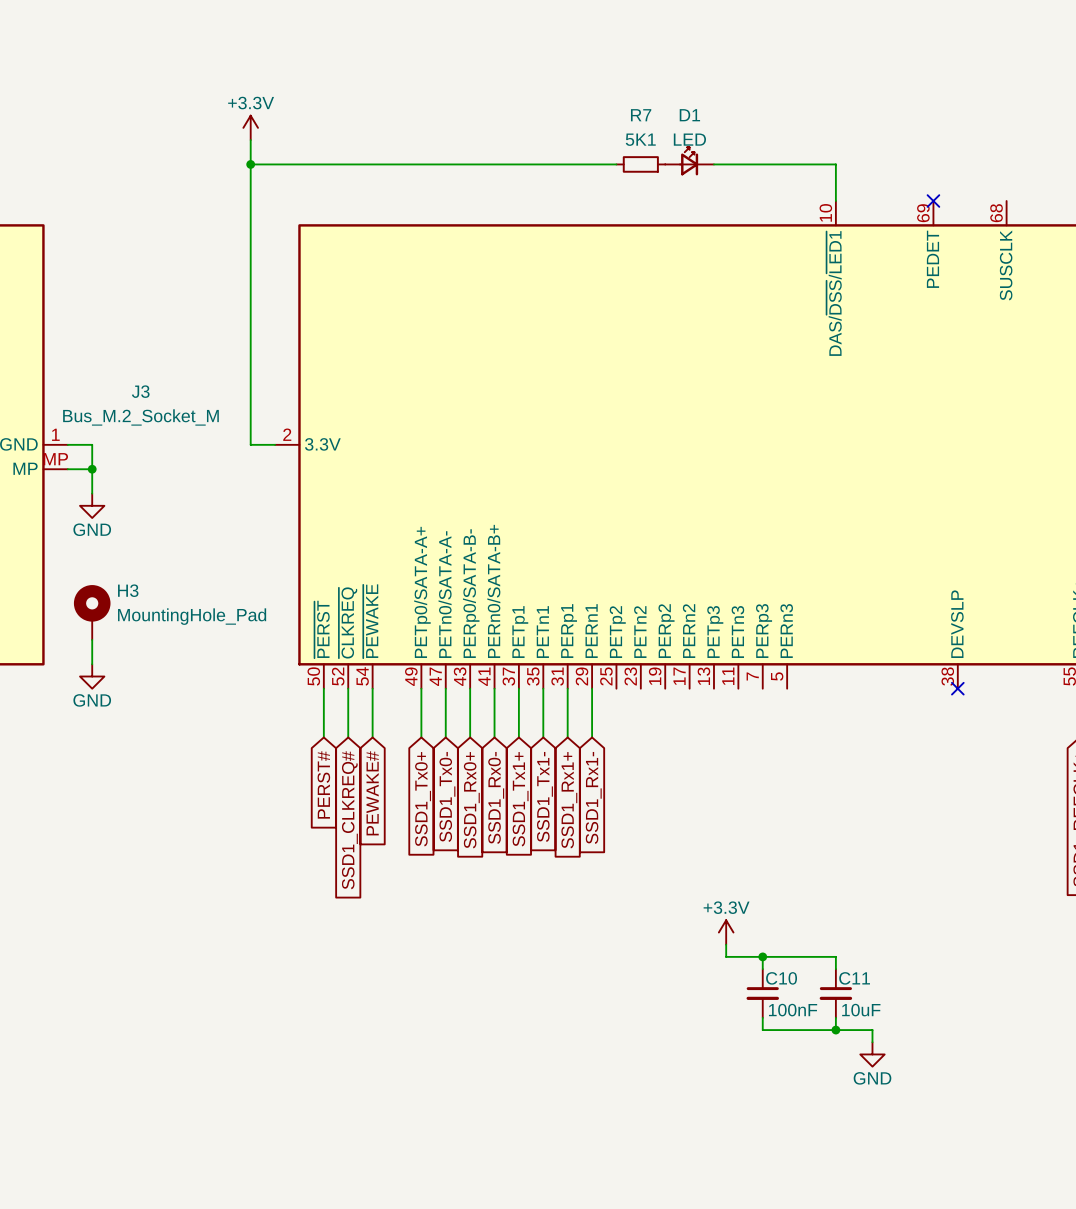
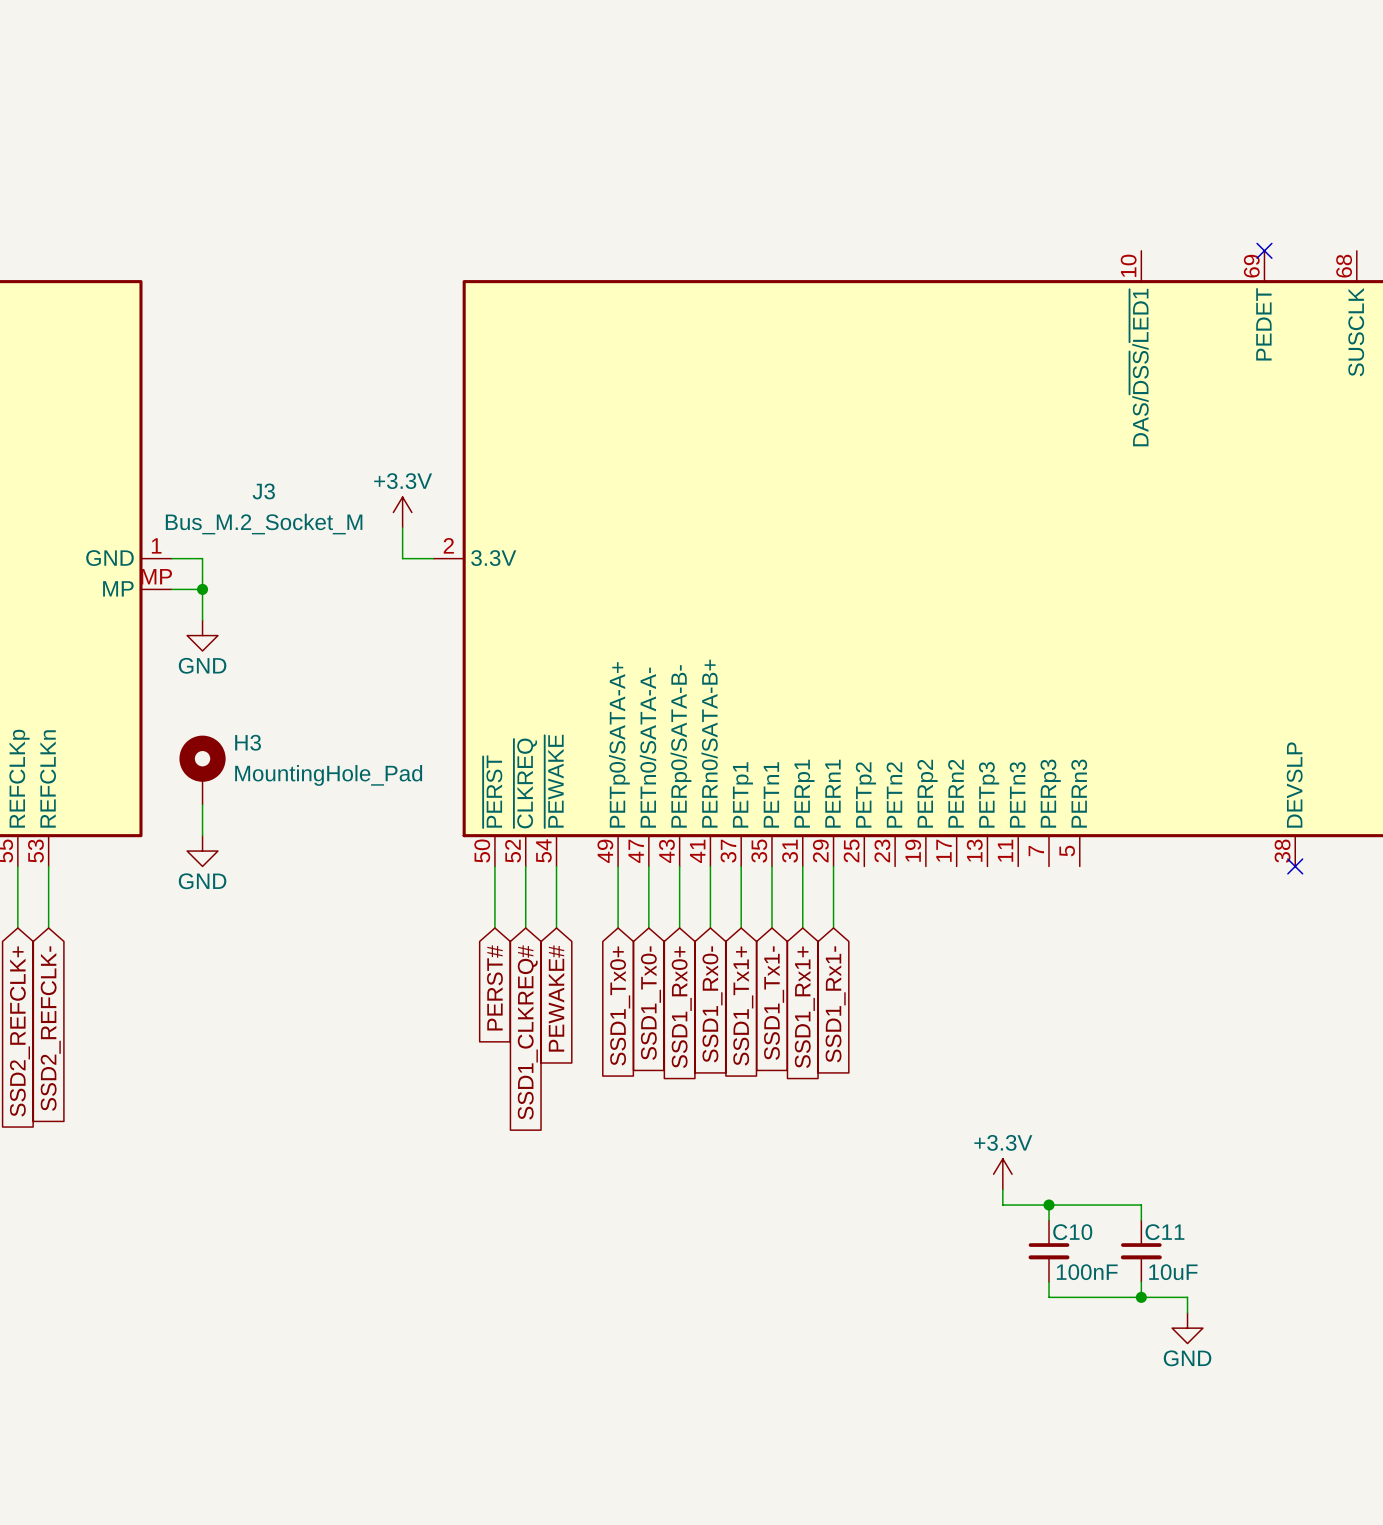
power symbol: +3.3V (250, 127) -> none
wire: (250, 140) (250, 420) -> none
D1: LED (689, 161) -> none
wire: (250, 164) (616, 164) -> none
junction: (250, 164) -> none
R7: 5K1 (640, 164) -> none
wire: (713, 164) (835, 164) (835, 201) -> none
power symbol: none -> +3.3V (402, 512)

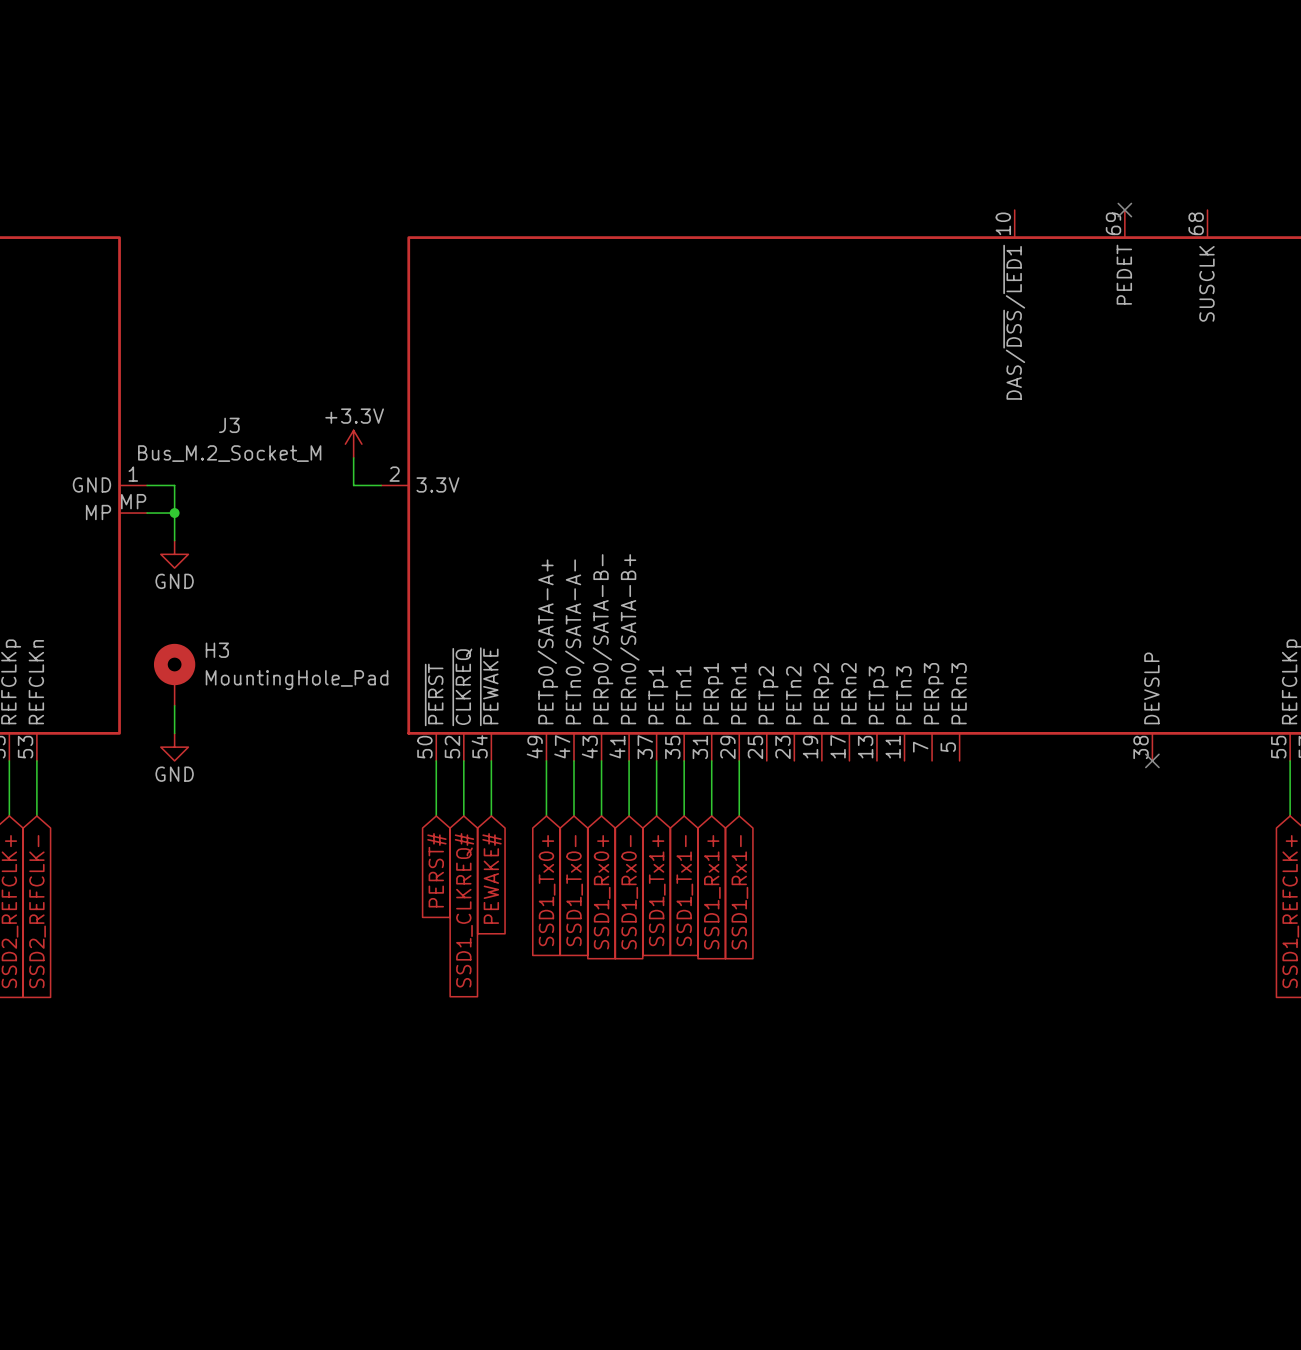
power symbol: +3.3V (1002, 1174) -> none
wire: (1002, 1189) (1002, 1205) (1141, 1205) (1141, 1220) -> none
wire: (1049, 1205) (1049, 1220) -> none
junction: (1049, 1205) -> none
C10: 100nF (1049, 1251) -> none
C11: 10uF (1141, 1251) -> none
wire: (1049, 1281) (1049, 1297) (1187, 1297) (1187, 1312) -> none
wire: (1141, 1281) (1141, 1297) -> none
junction: (1141, 1297) -> none
power symbol: GND (1187, 1328) -> none

